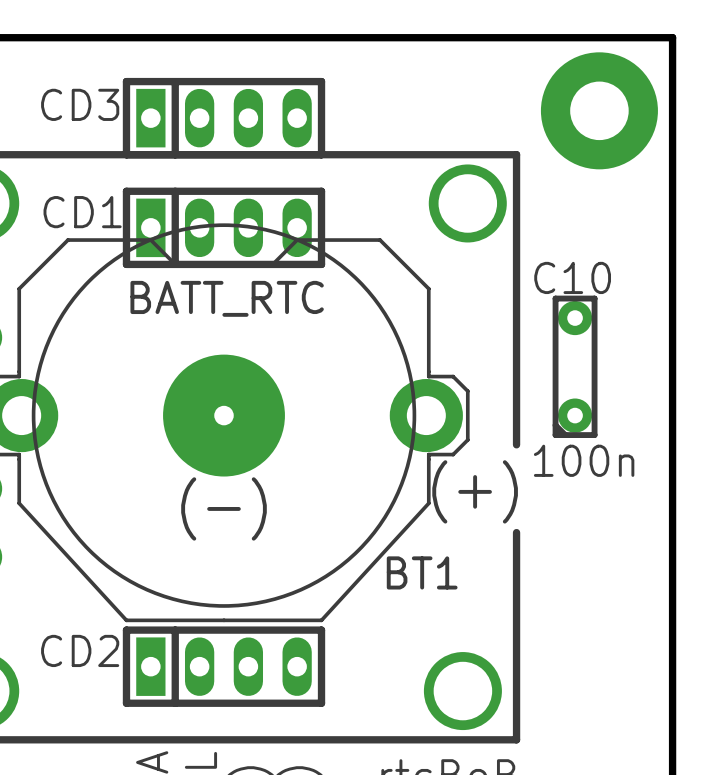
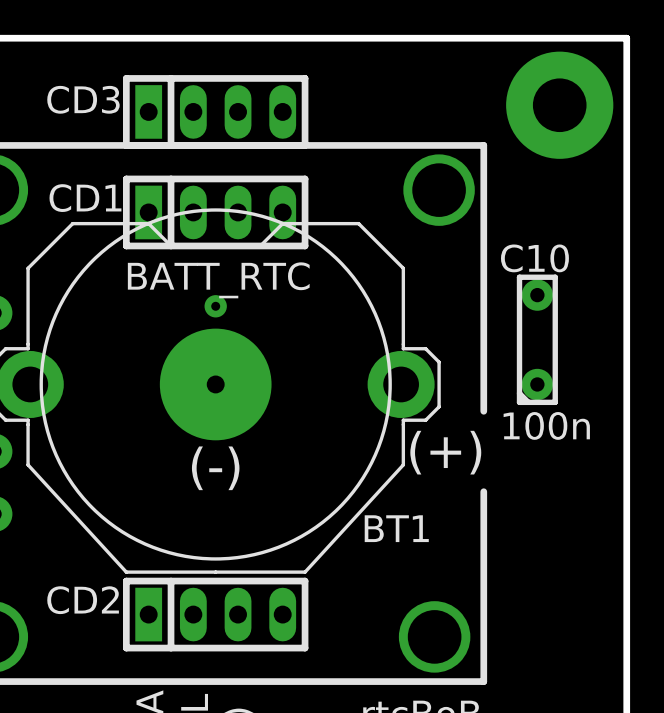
via: none -> (215, 306)

